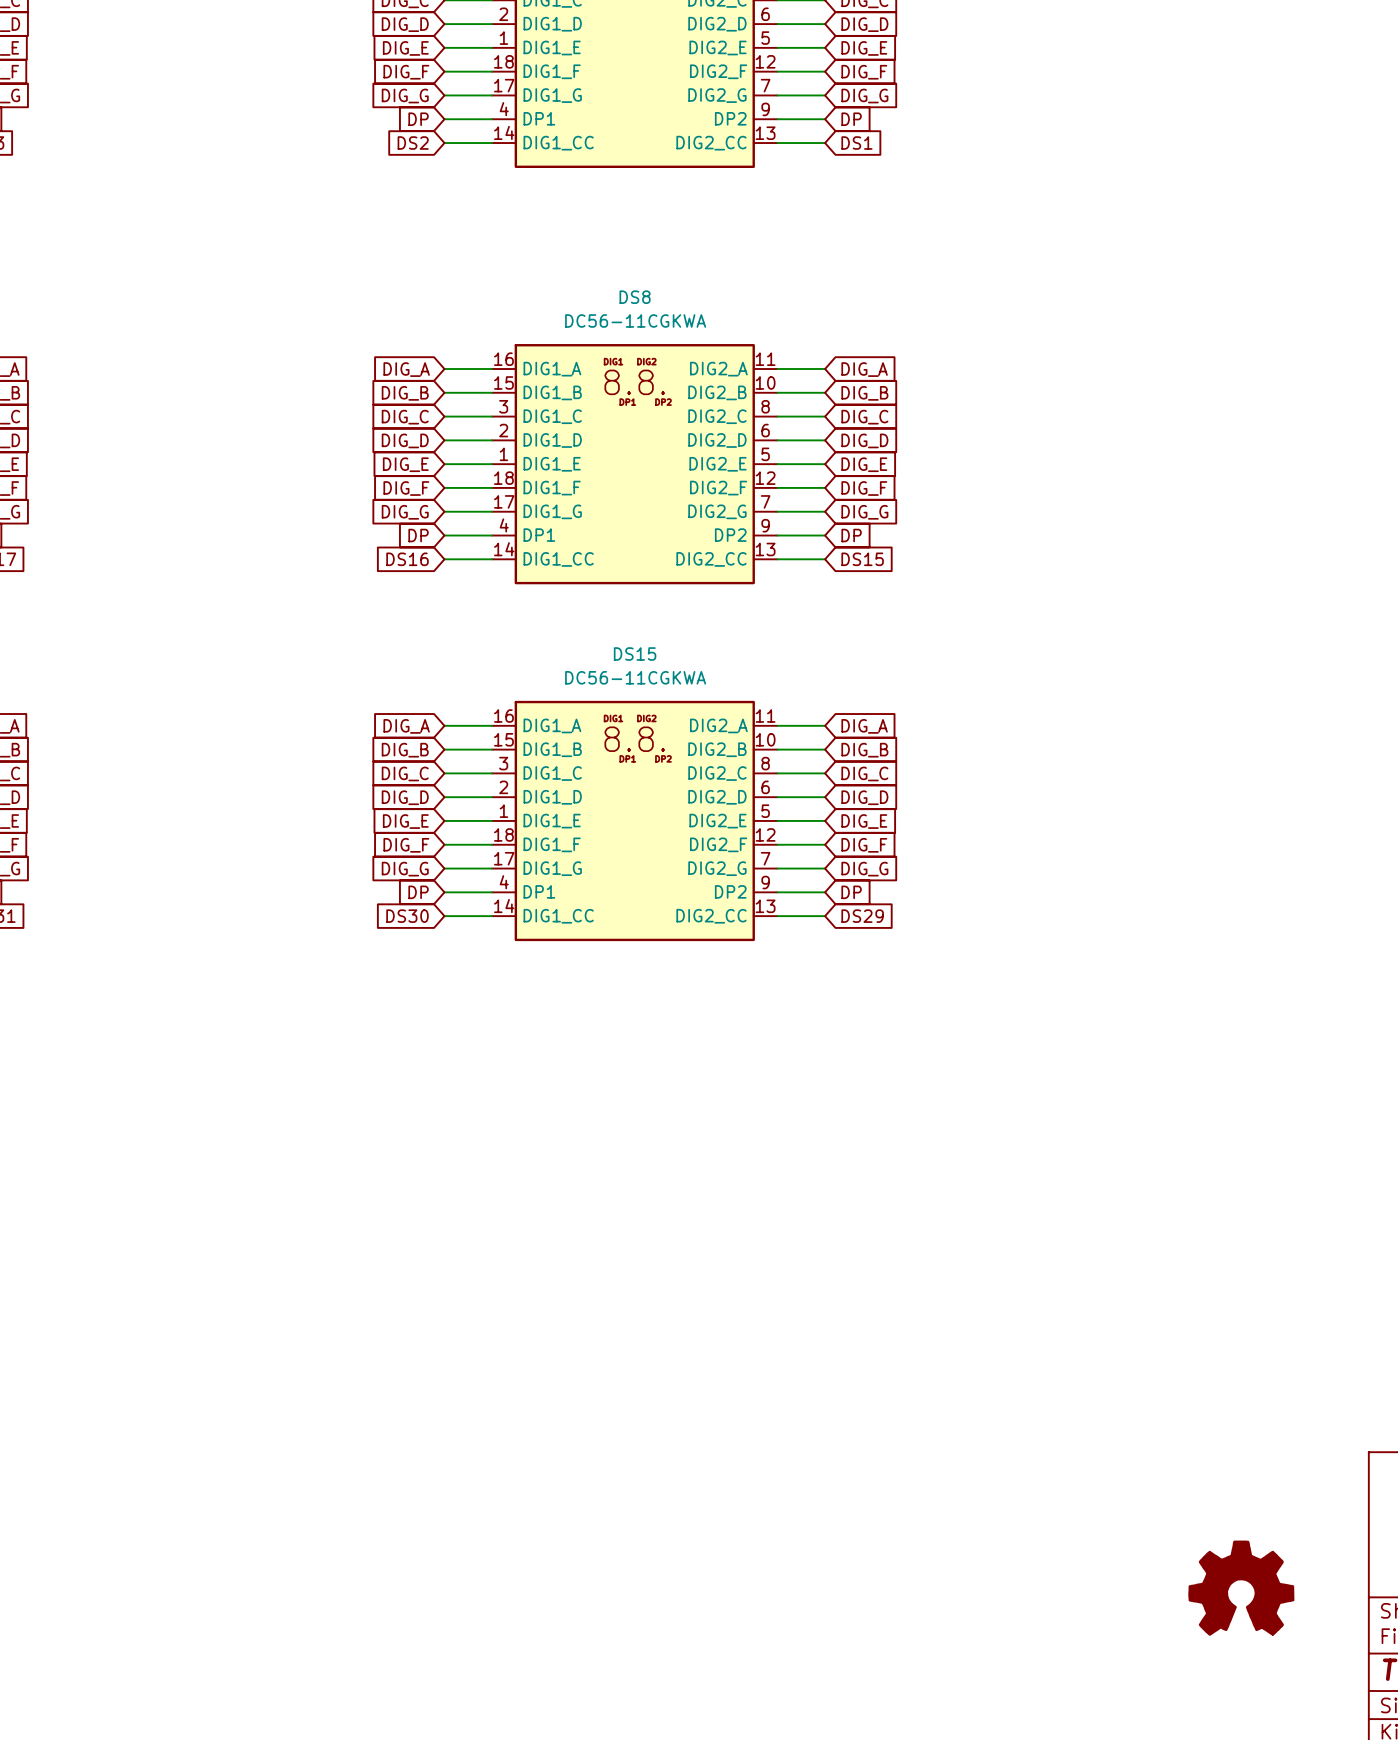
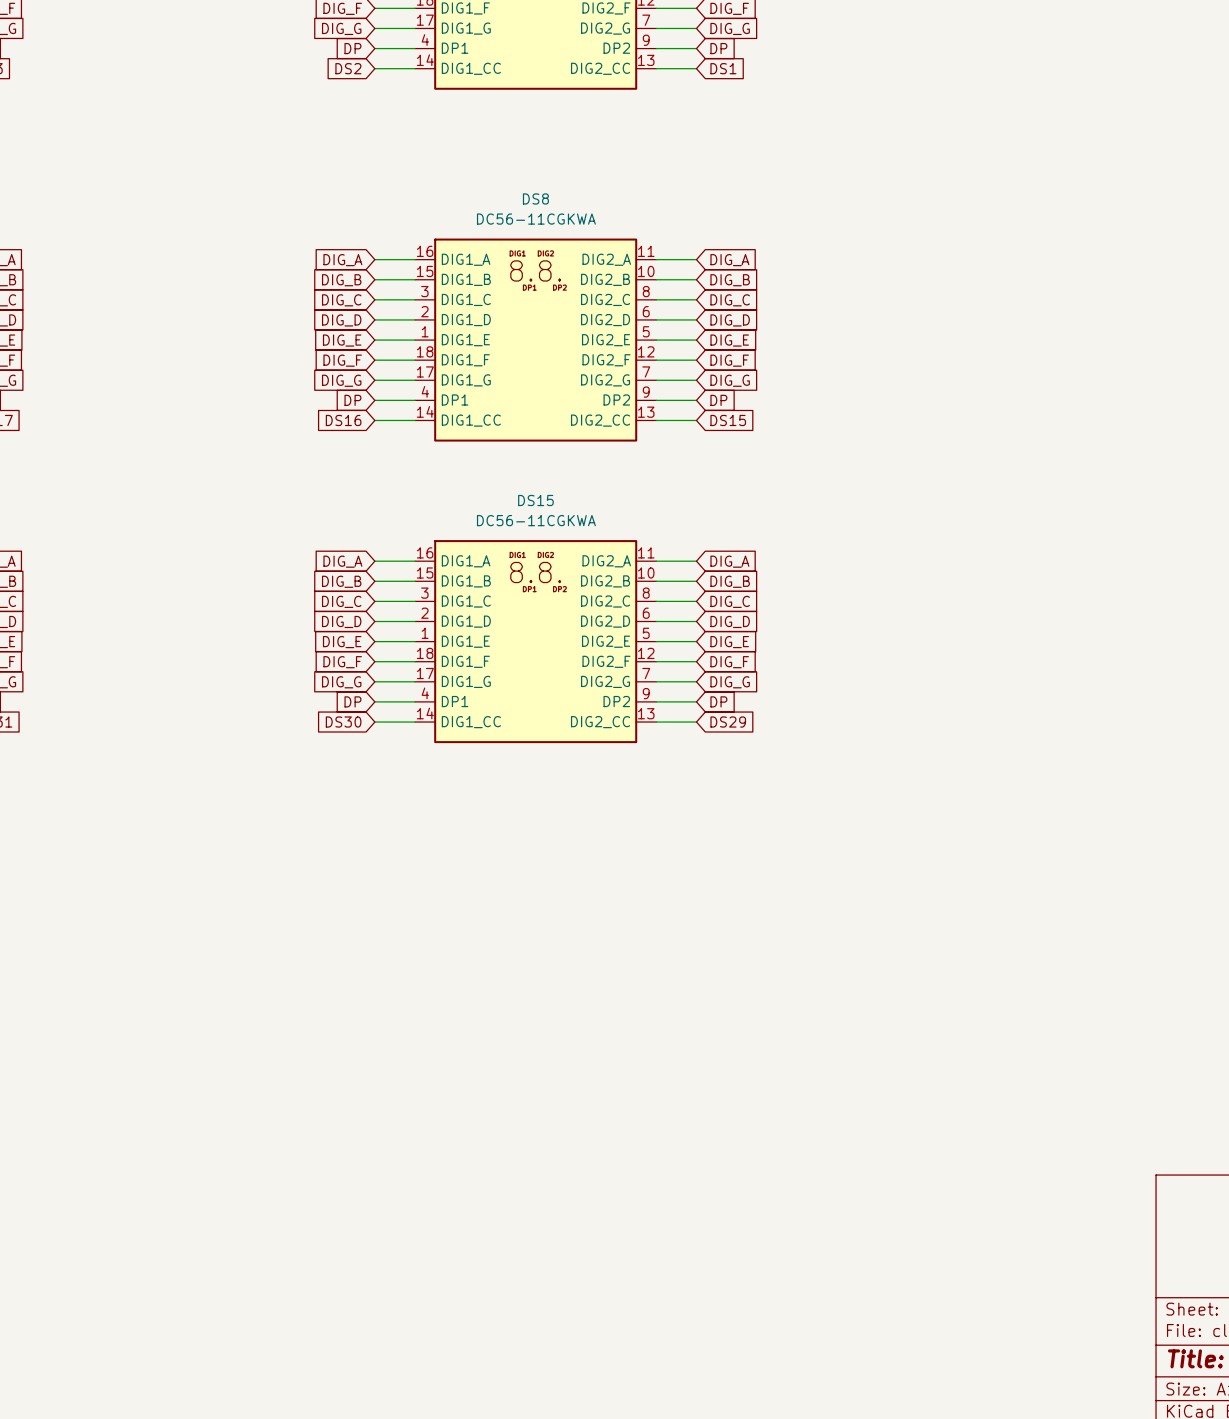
part: (1241, 1588) -> none

